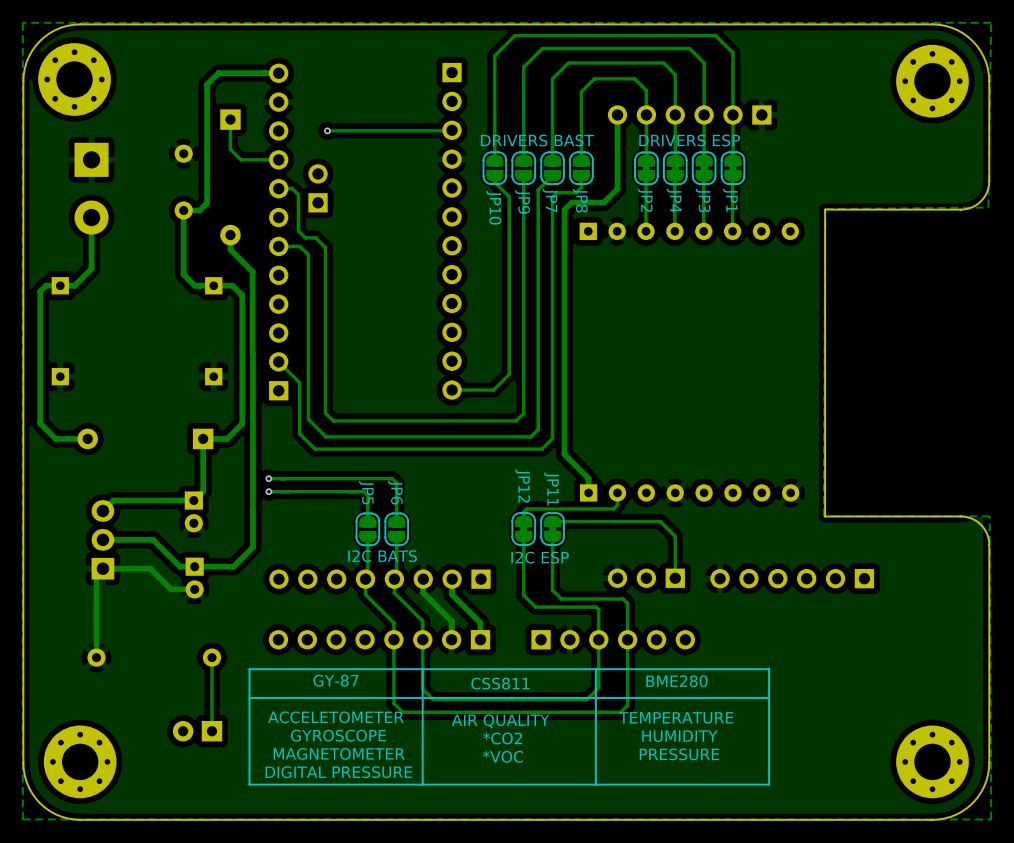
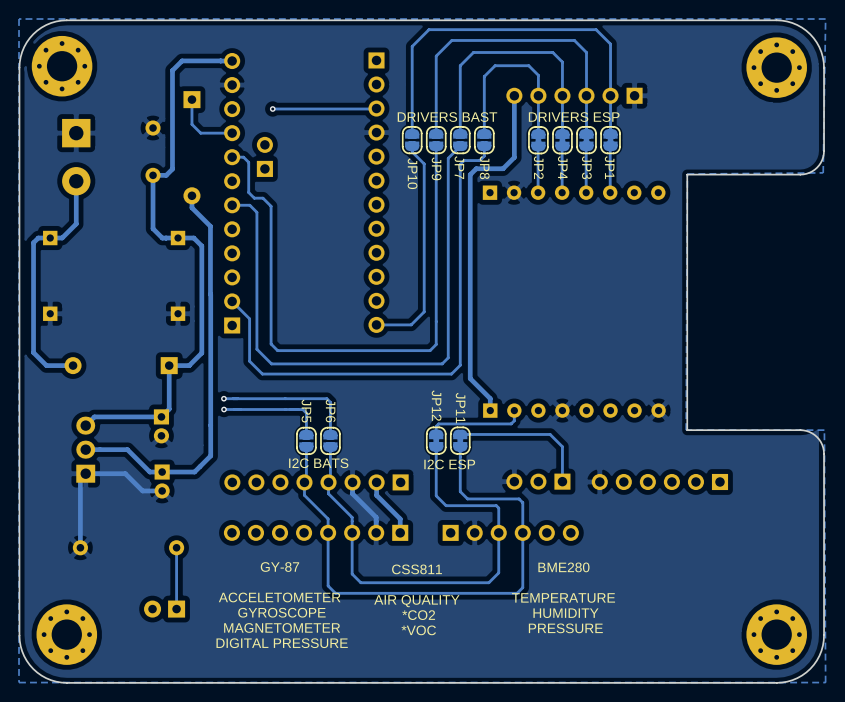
line: (422, 669) (422, 784) -> none
line: (595, 669) (595, 784) -> none
line: (769, 669) (249, 669) (249, 784) (769, 784) (769, 669) -> none
line: (769, 698) (249, 698) -> none

